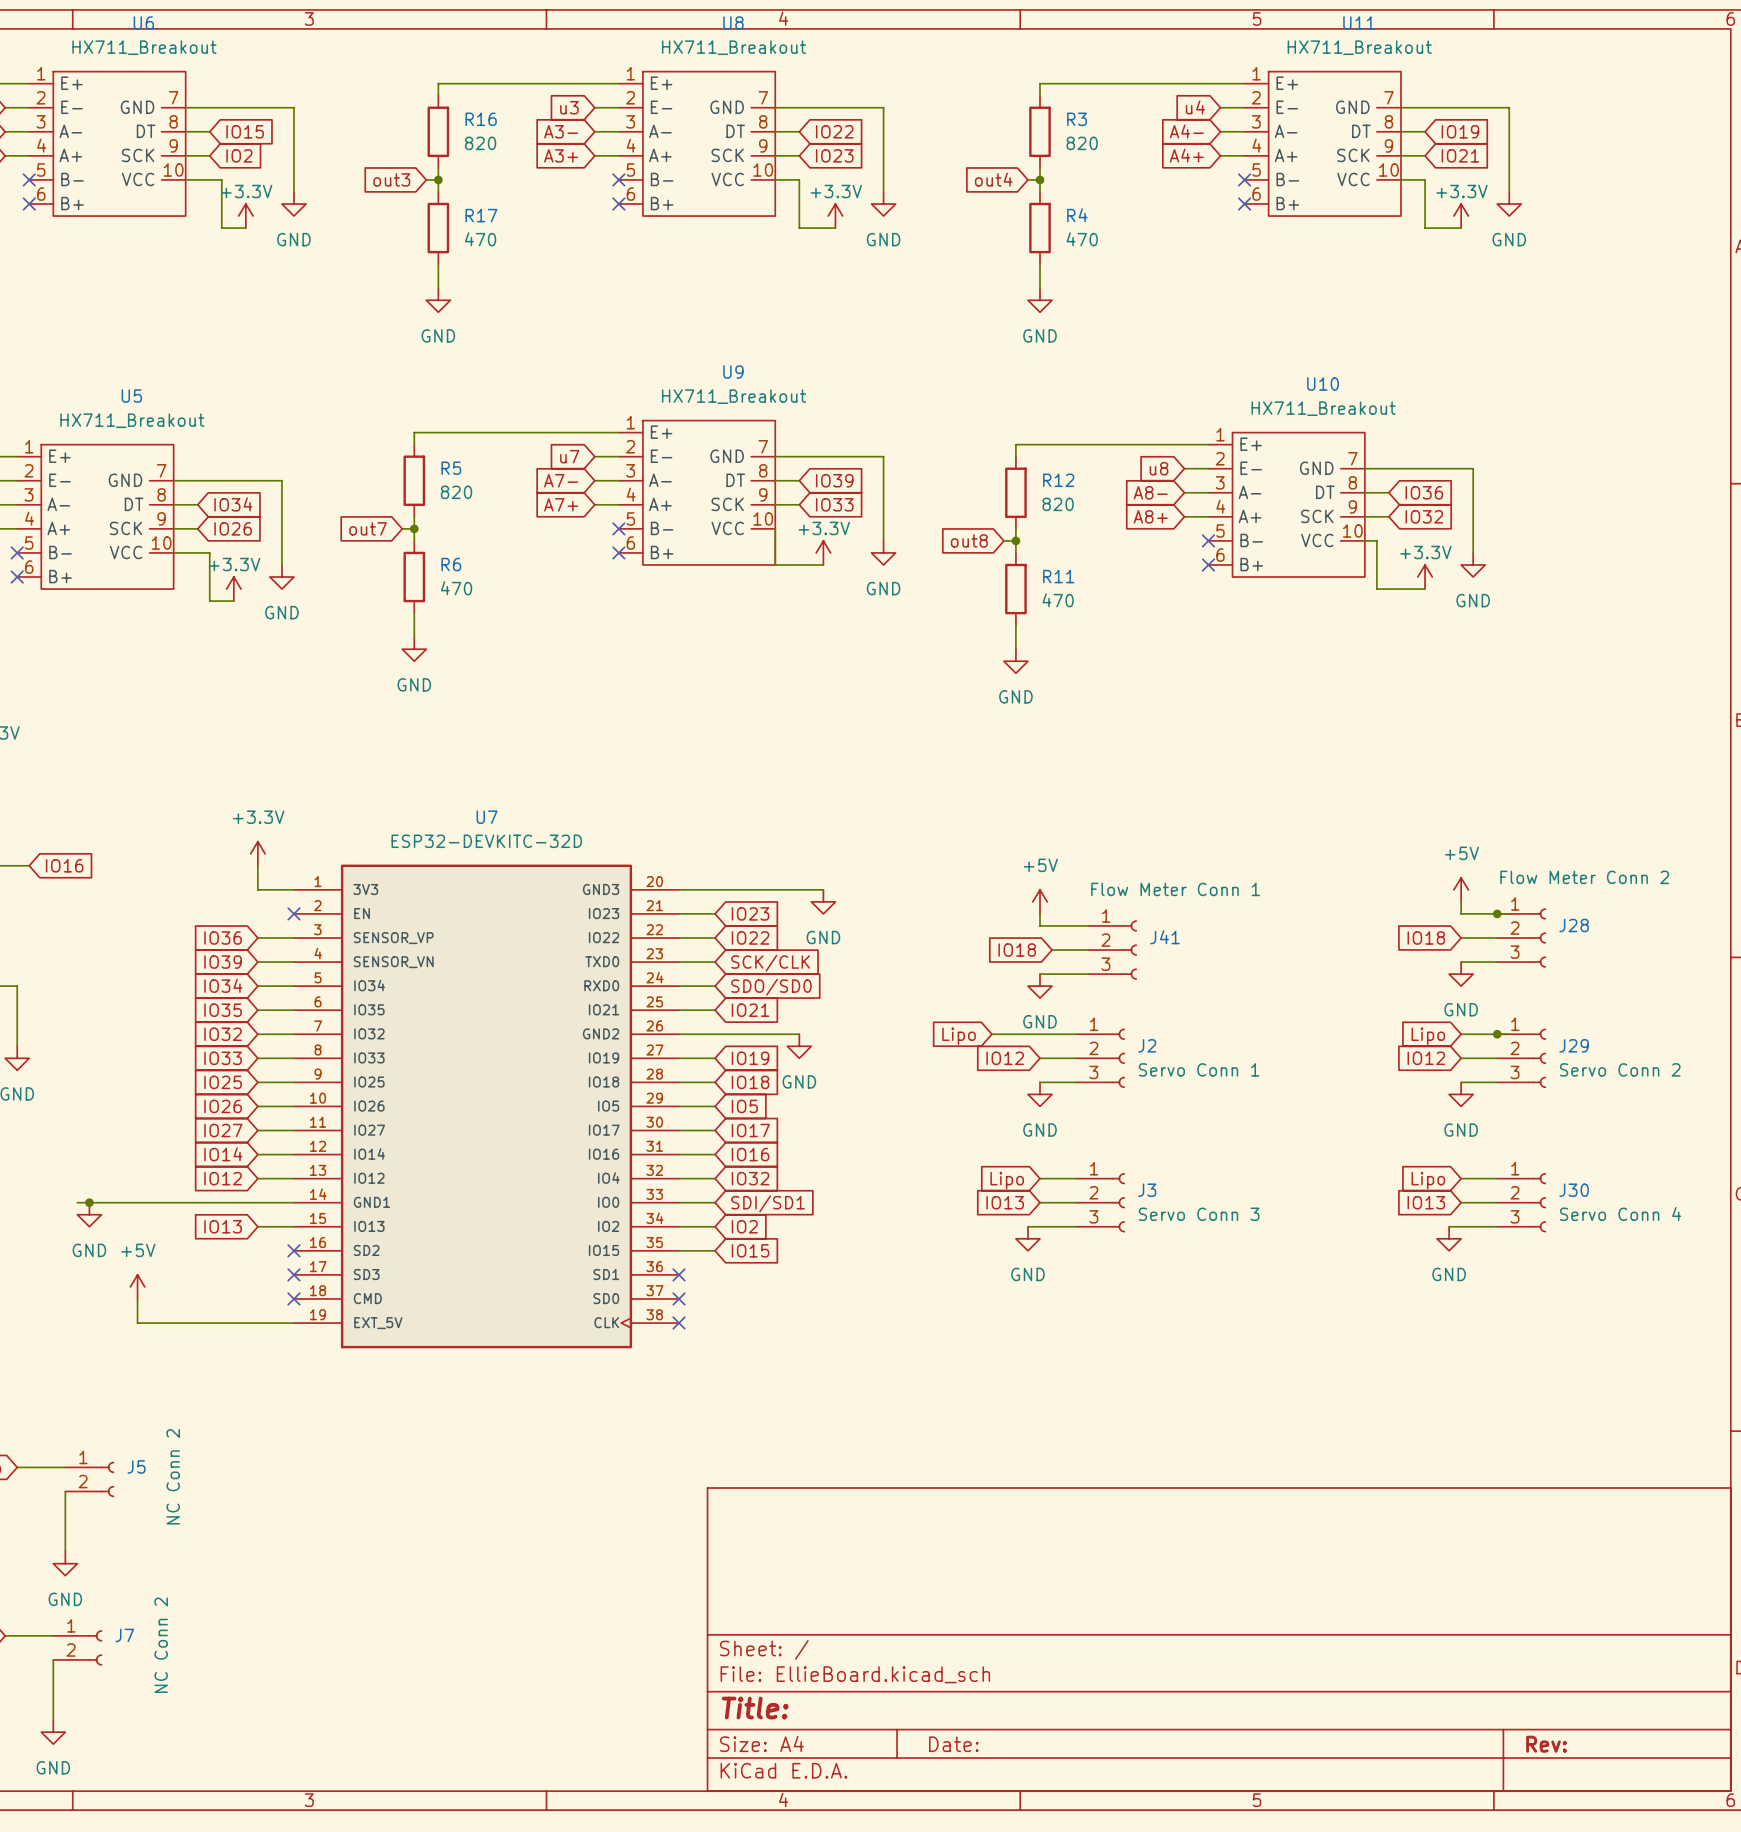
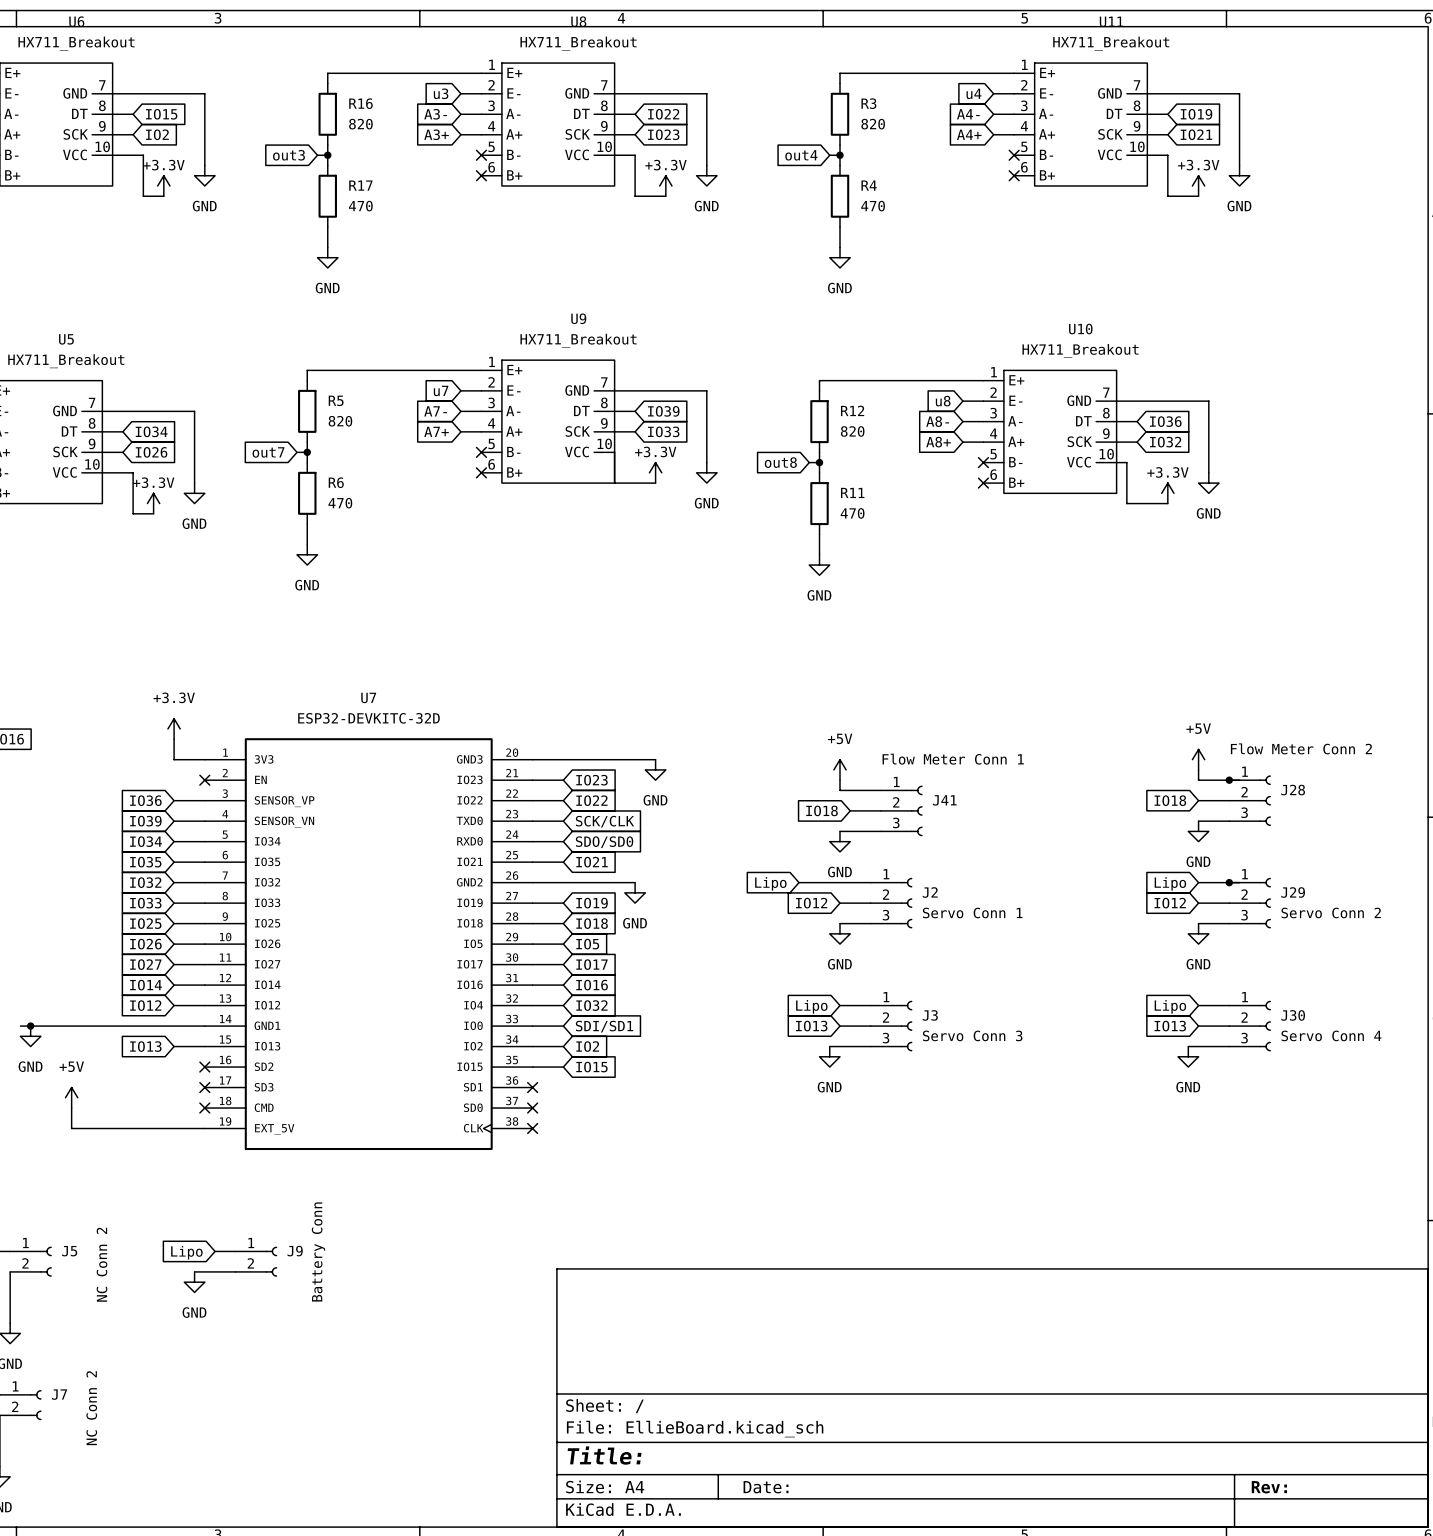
wire: none -> (215, 1251) (235, 1251)
global label: none -> Lipo (186, 1252)
J9: none -> Battery Conn (256, 1261)
wire: none -> (194, 1271) (235, 1271)
power symbol: none -> GND (194, 1282)

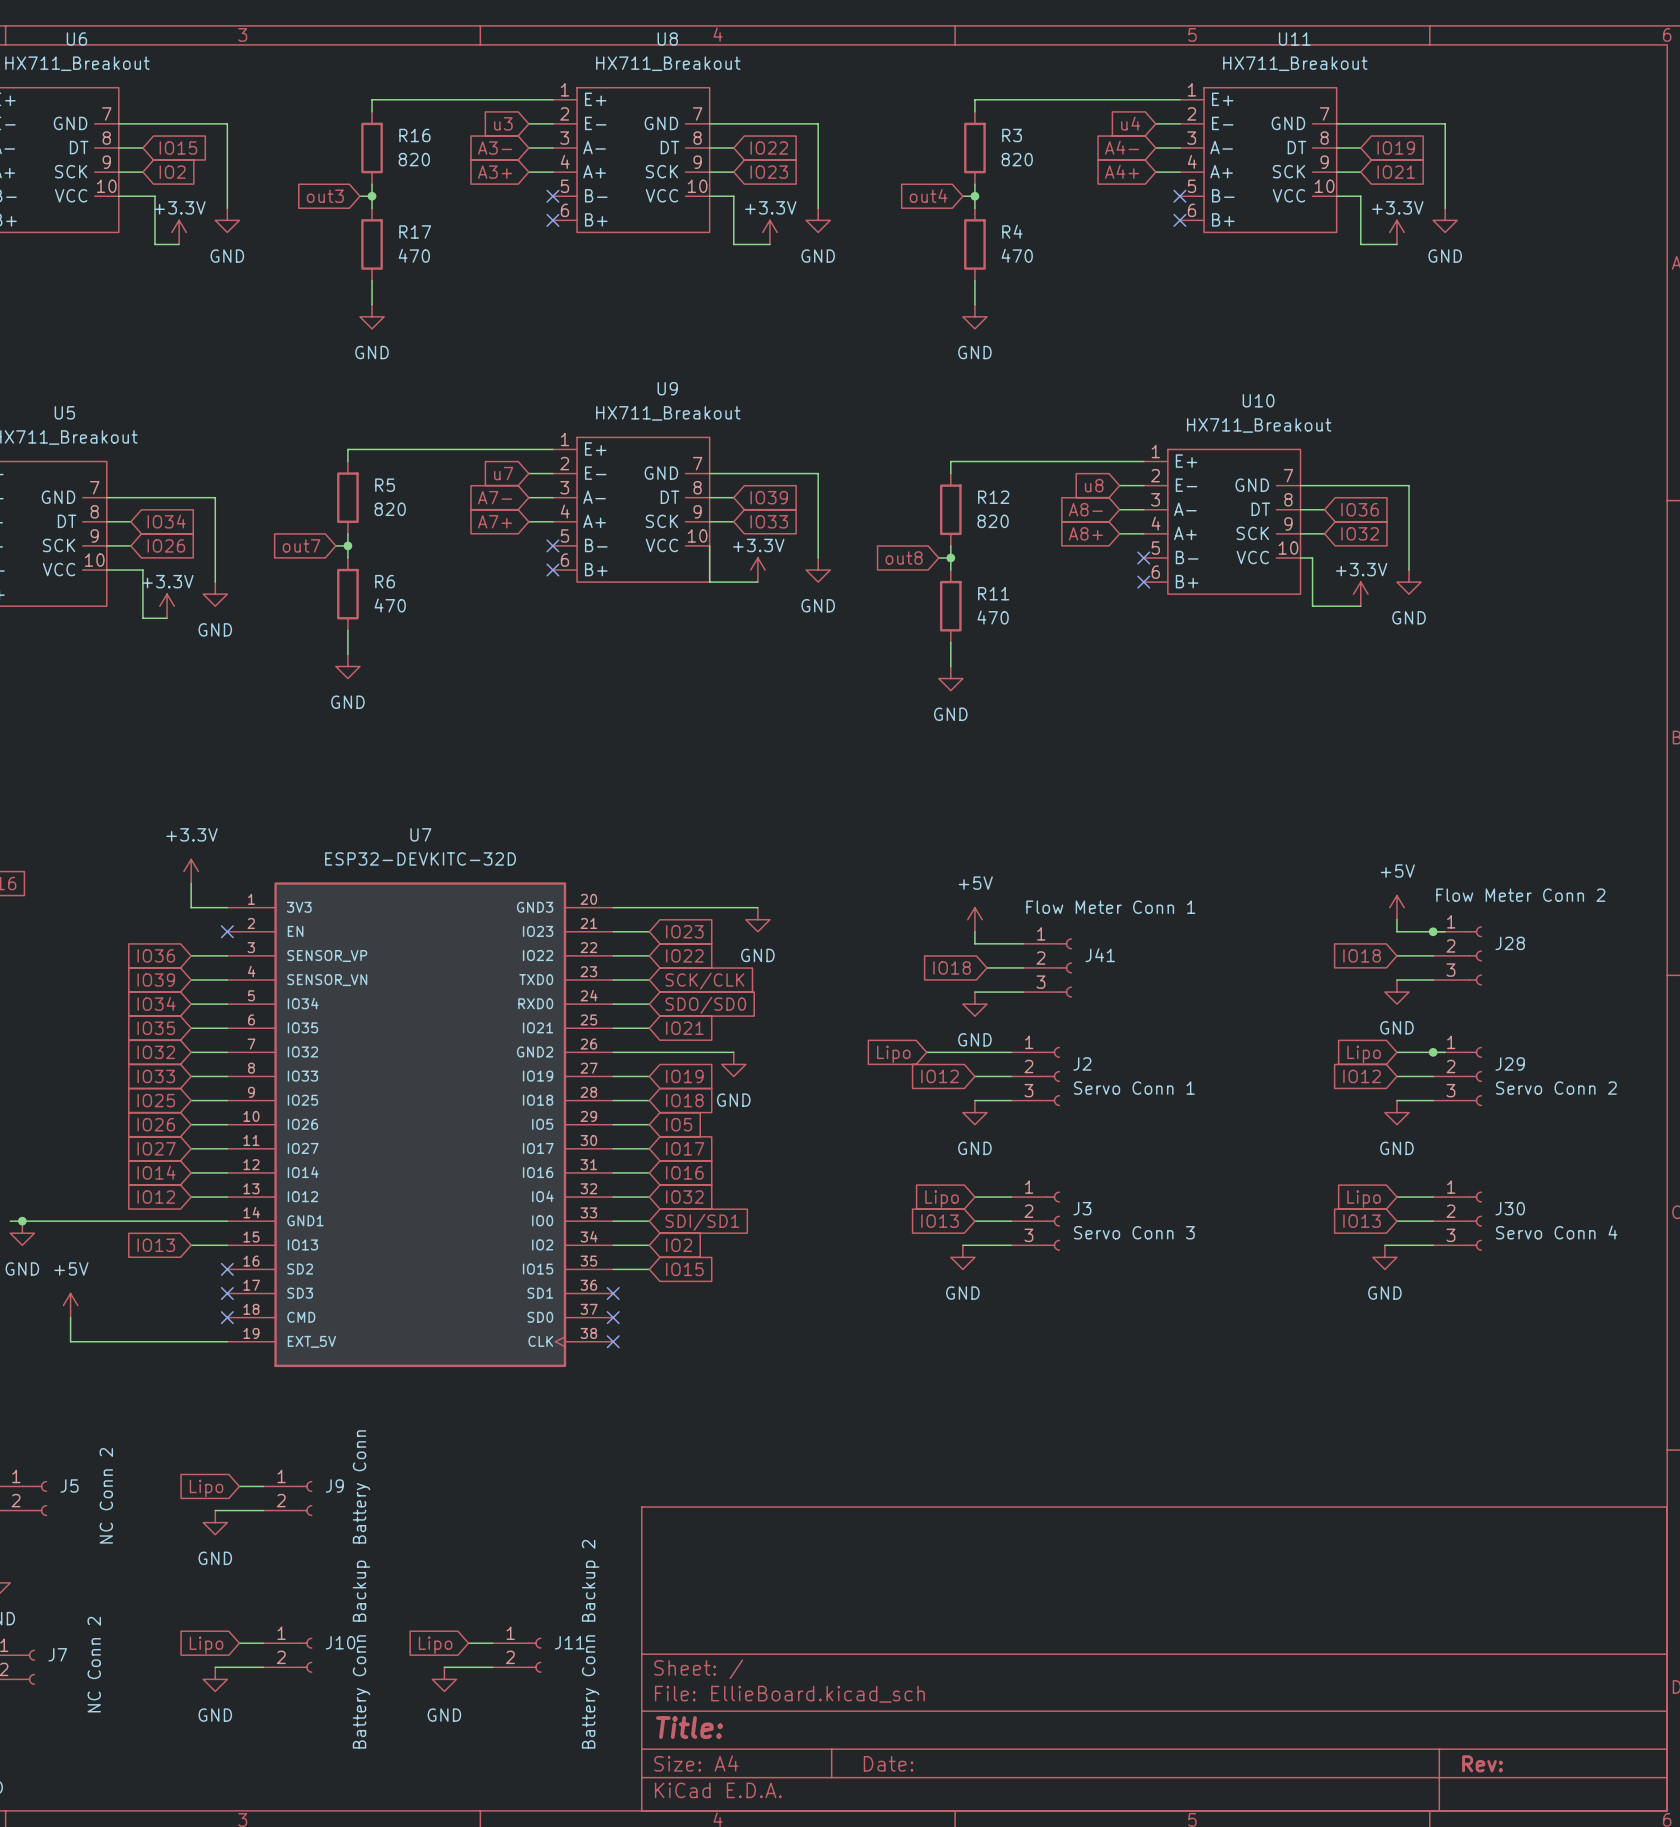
wire: none -> (239, 1643) (263, 1643)
wire: none -> (468, 1643) (492, 1643)
global label: none -> Lipo (206, 1645)
global label: none -> Lipo (435, 1645)
J10: none -> Battery Conn Backup (287, 1655)
J11: none -> Battery Conn Backup 2 (517, 1655)
wire: none -> (215, 1667) (263, 1667)
wire: none -> (444, 1667) (492, 1667)
power symbol: none -> GND (215, 1679)
power symbol: none -> GND (444, 1679)

